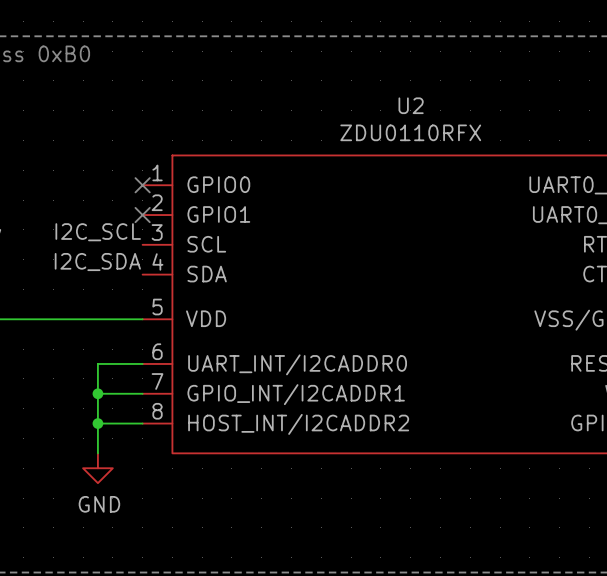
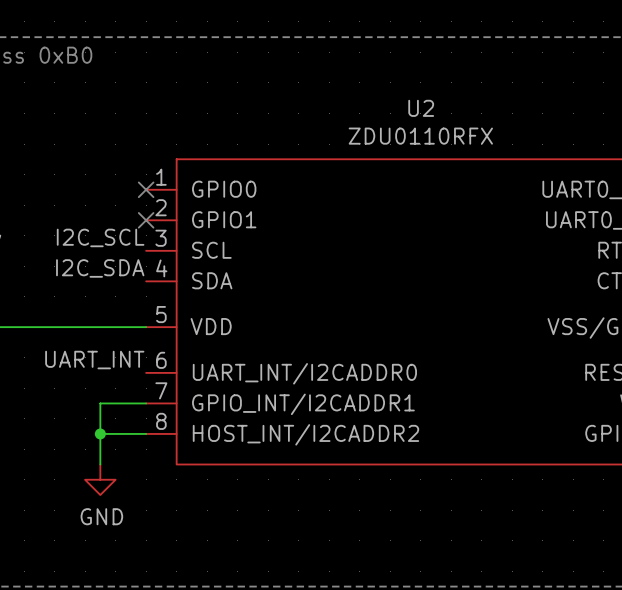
label: none -> UART_INT (94, 360)
wire: (142, 363) (97, 363) (97, 393) -> none
junction: (97, 393) -> none

